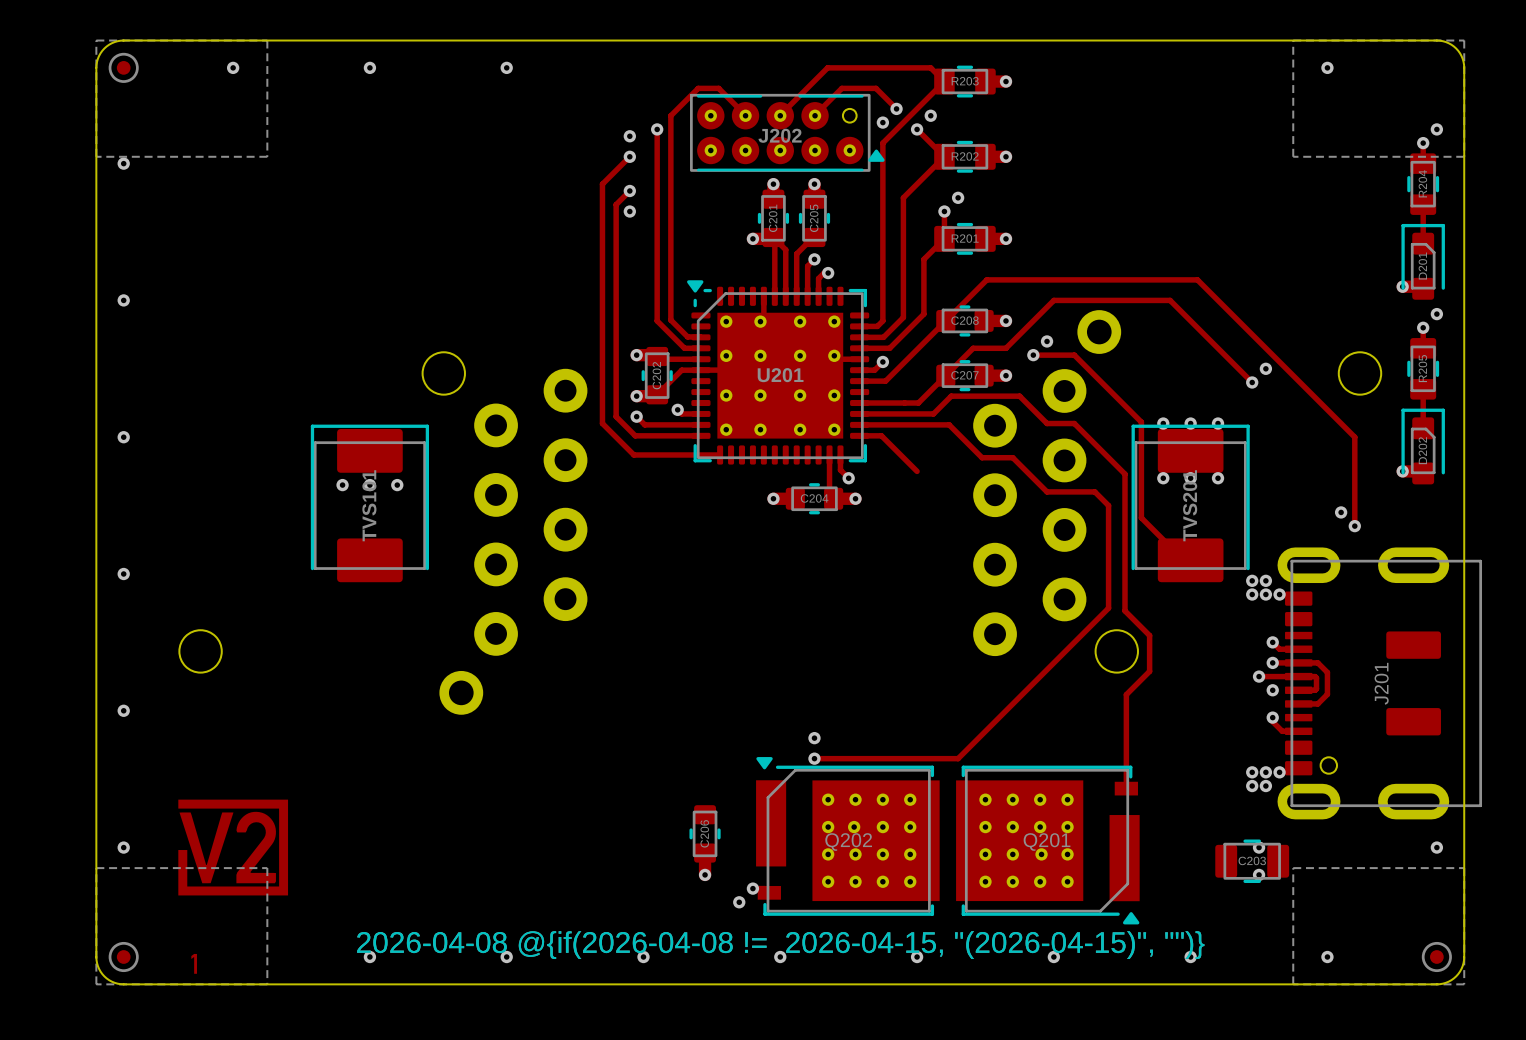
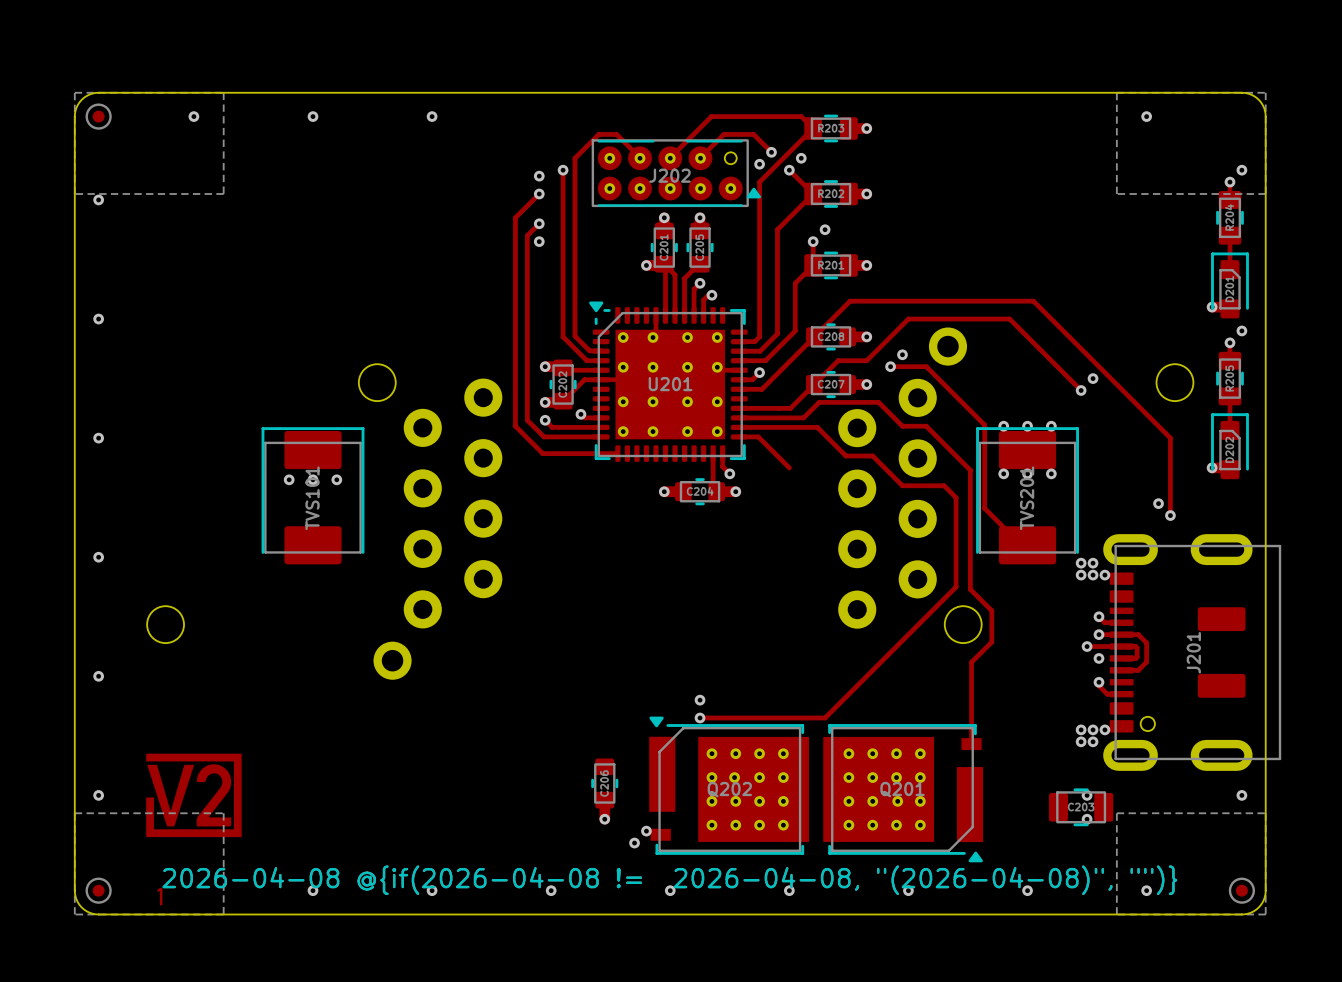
drawing shape: [357, 931, 1205, 960] -> [162, 865, 1178, 896]

